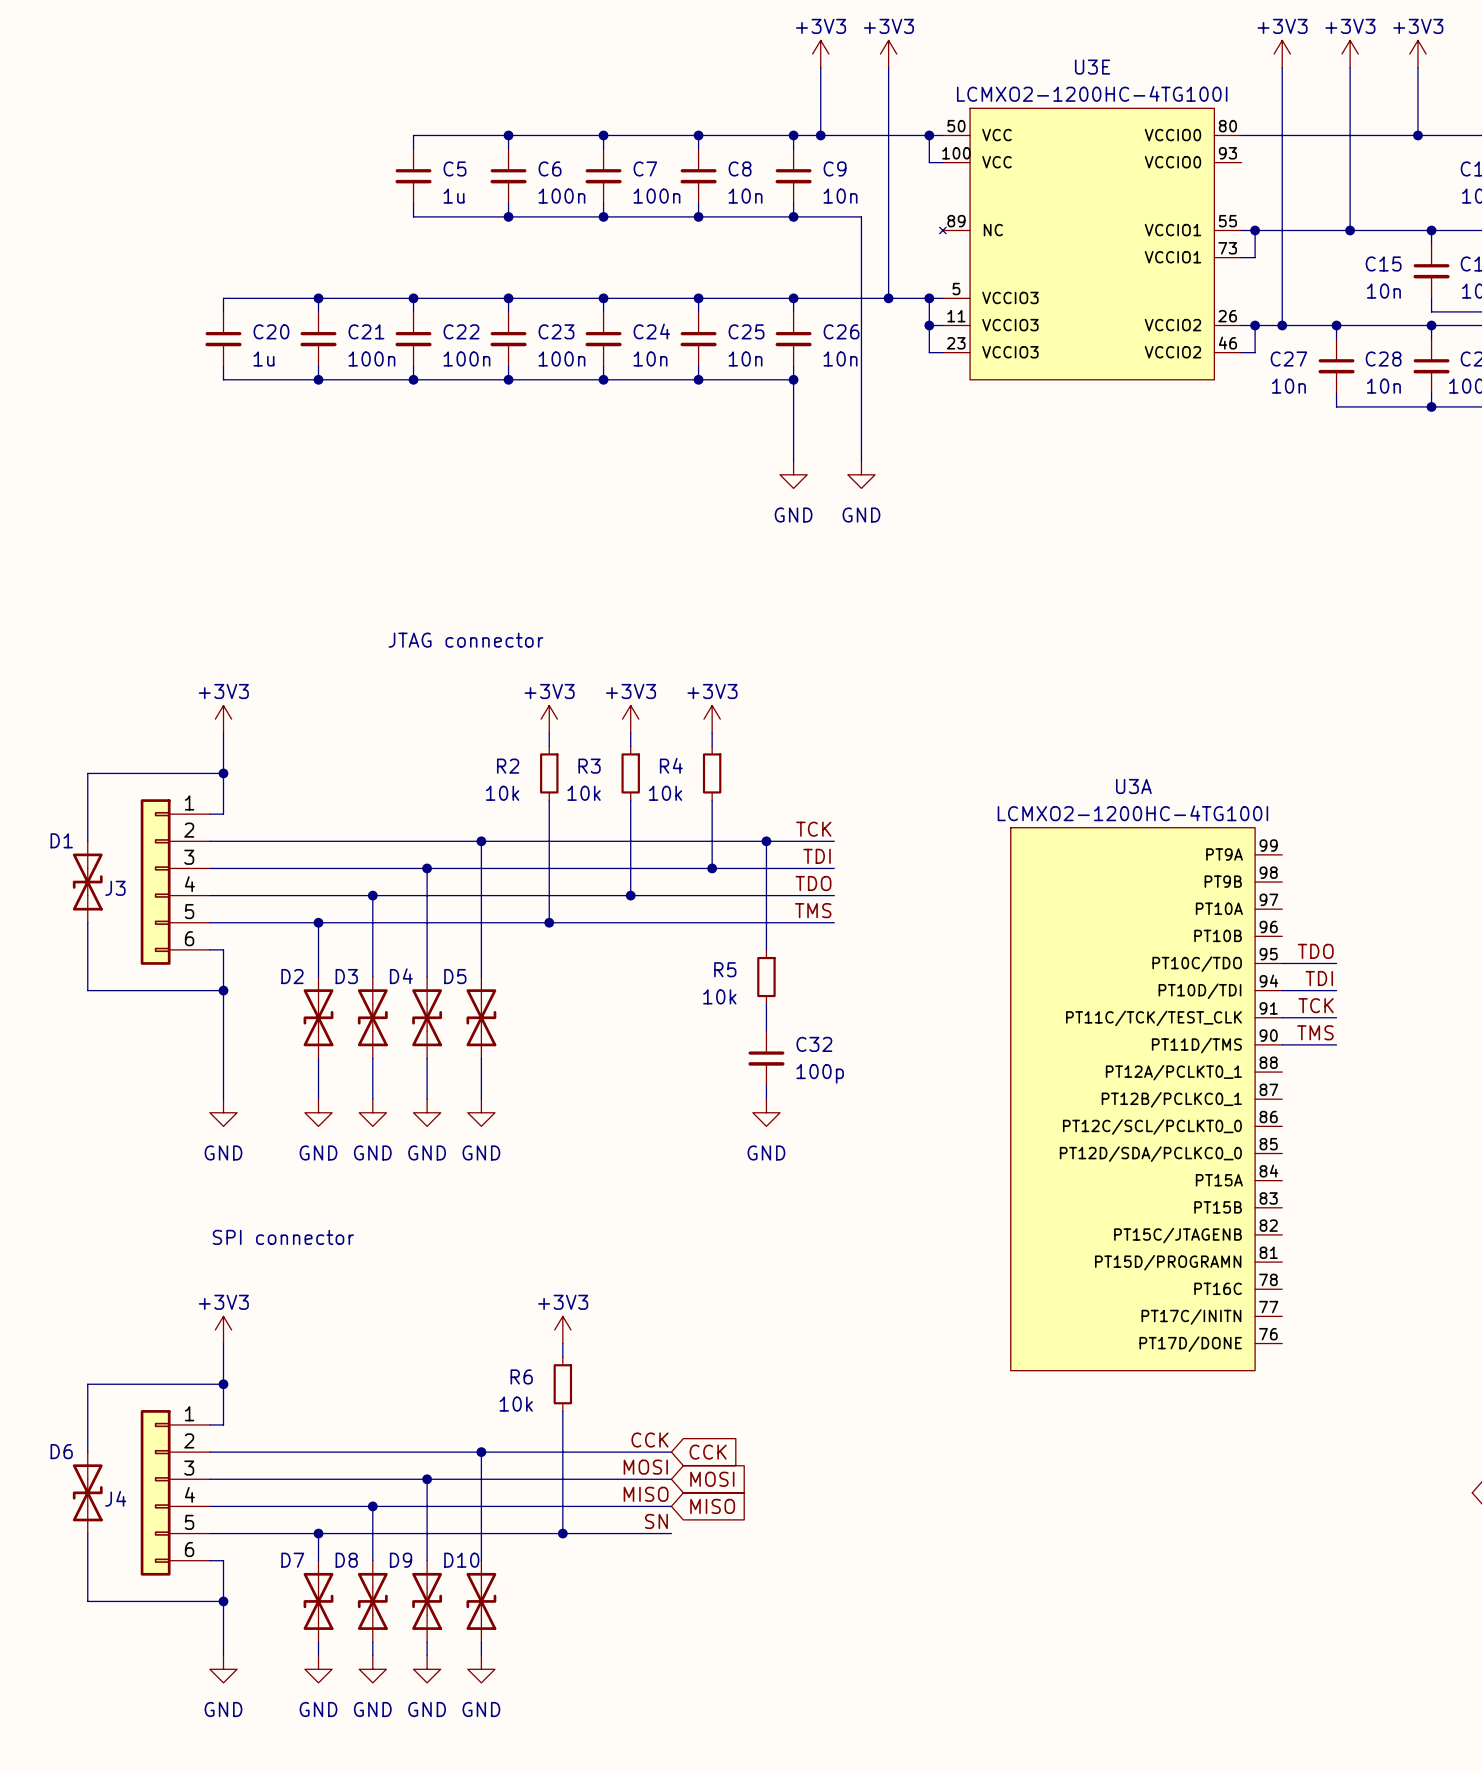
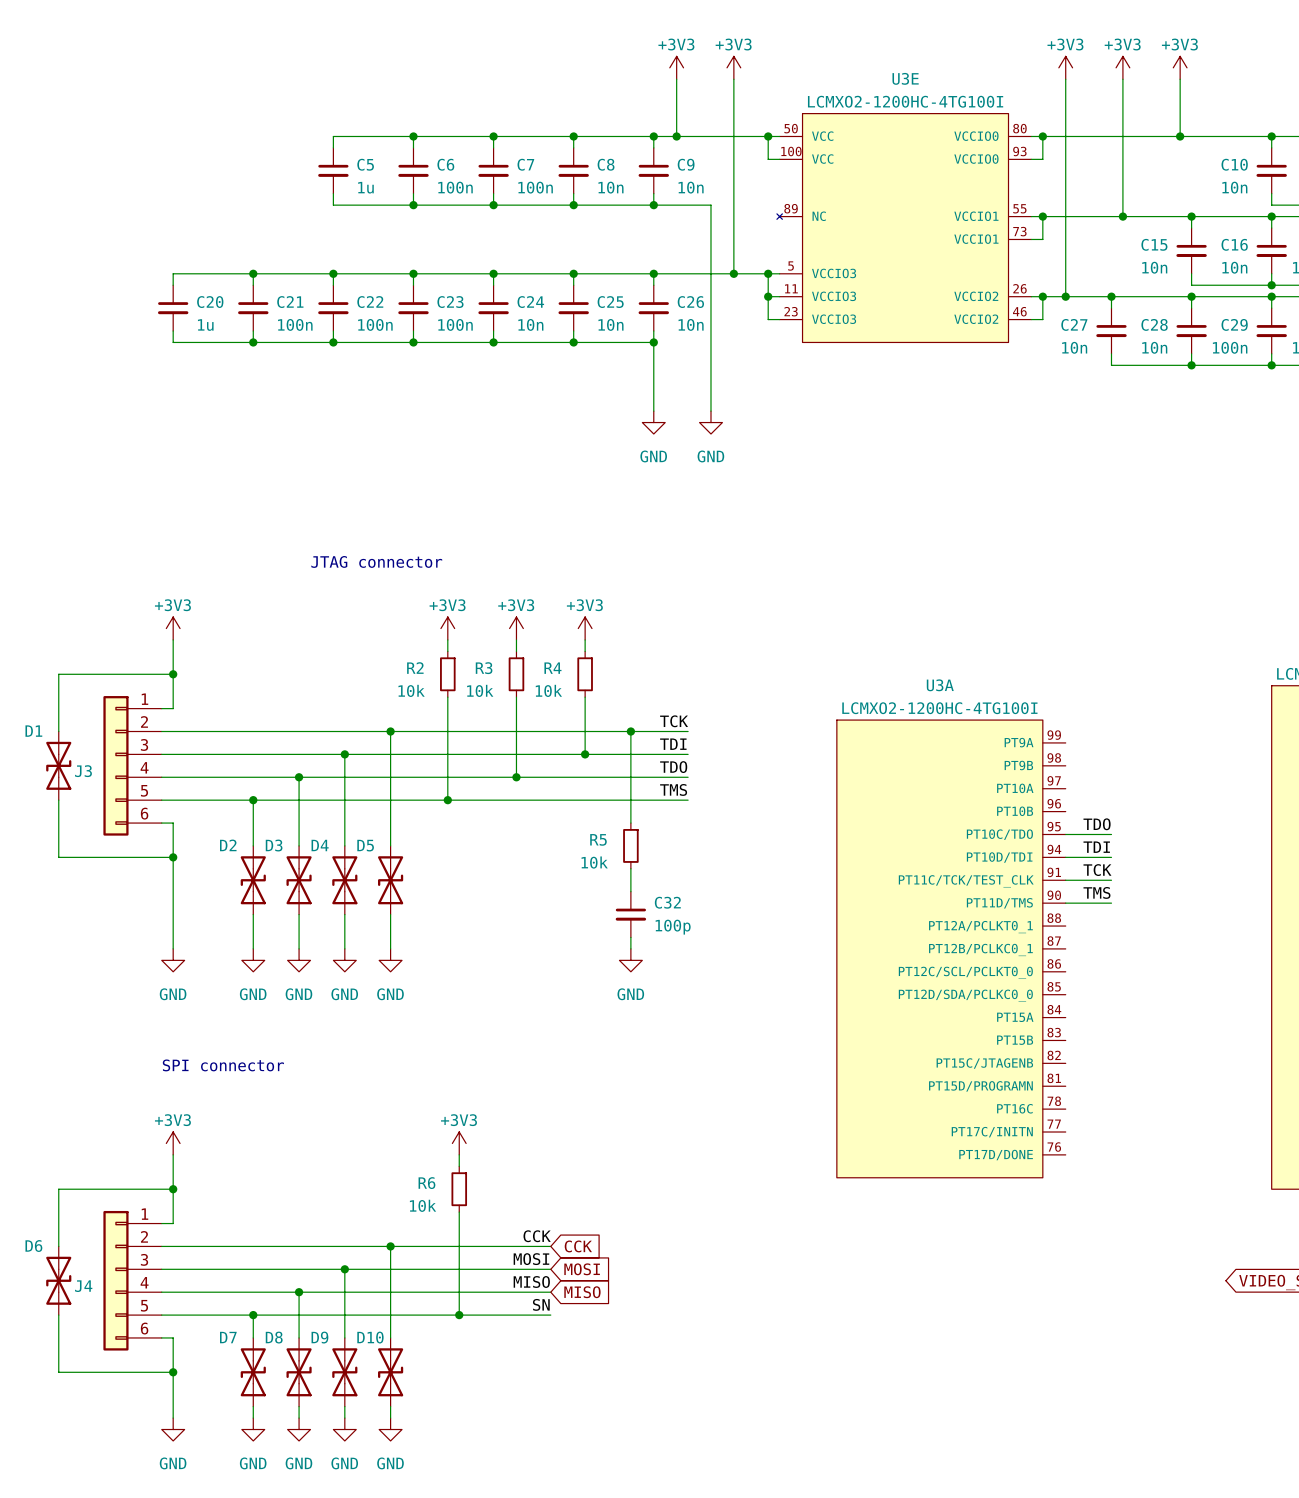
wire: none -> (1042, 136) (1042, 159) (1031, 159)
junction: none -> (1042, 136)

